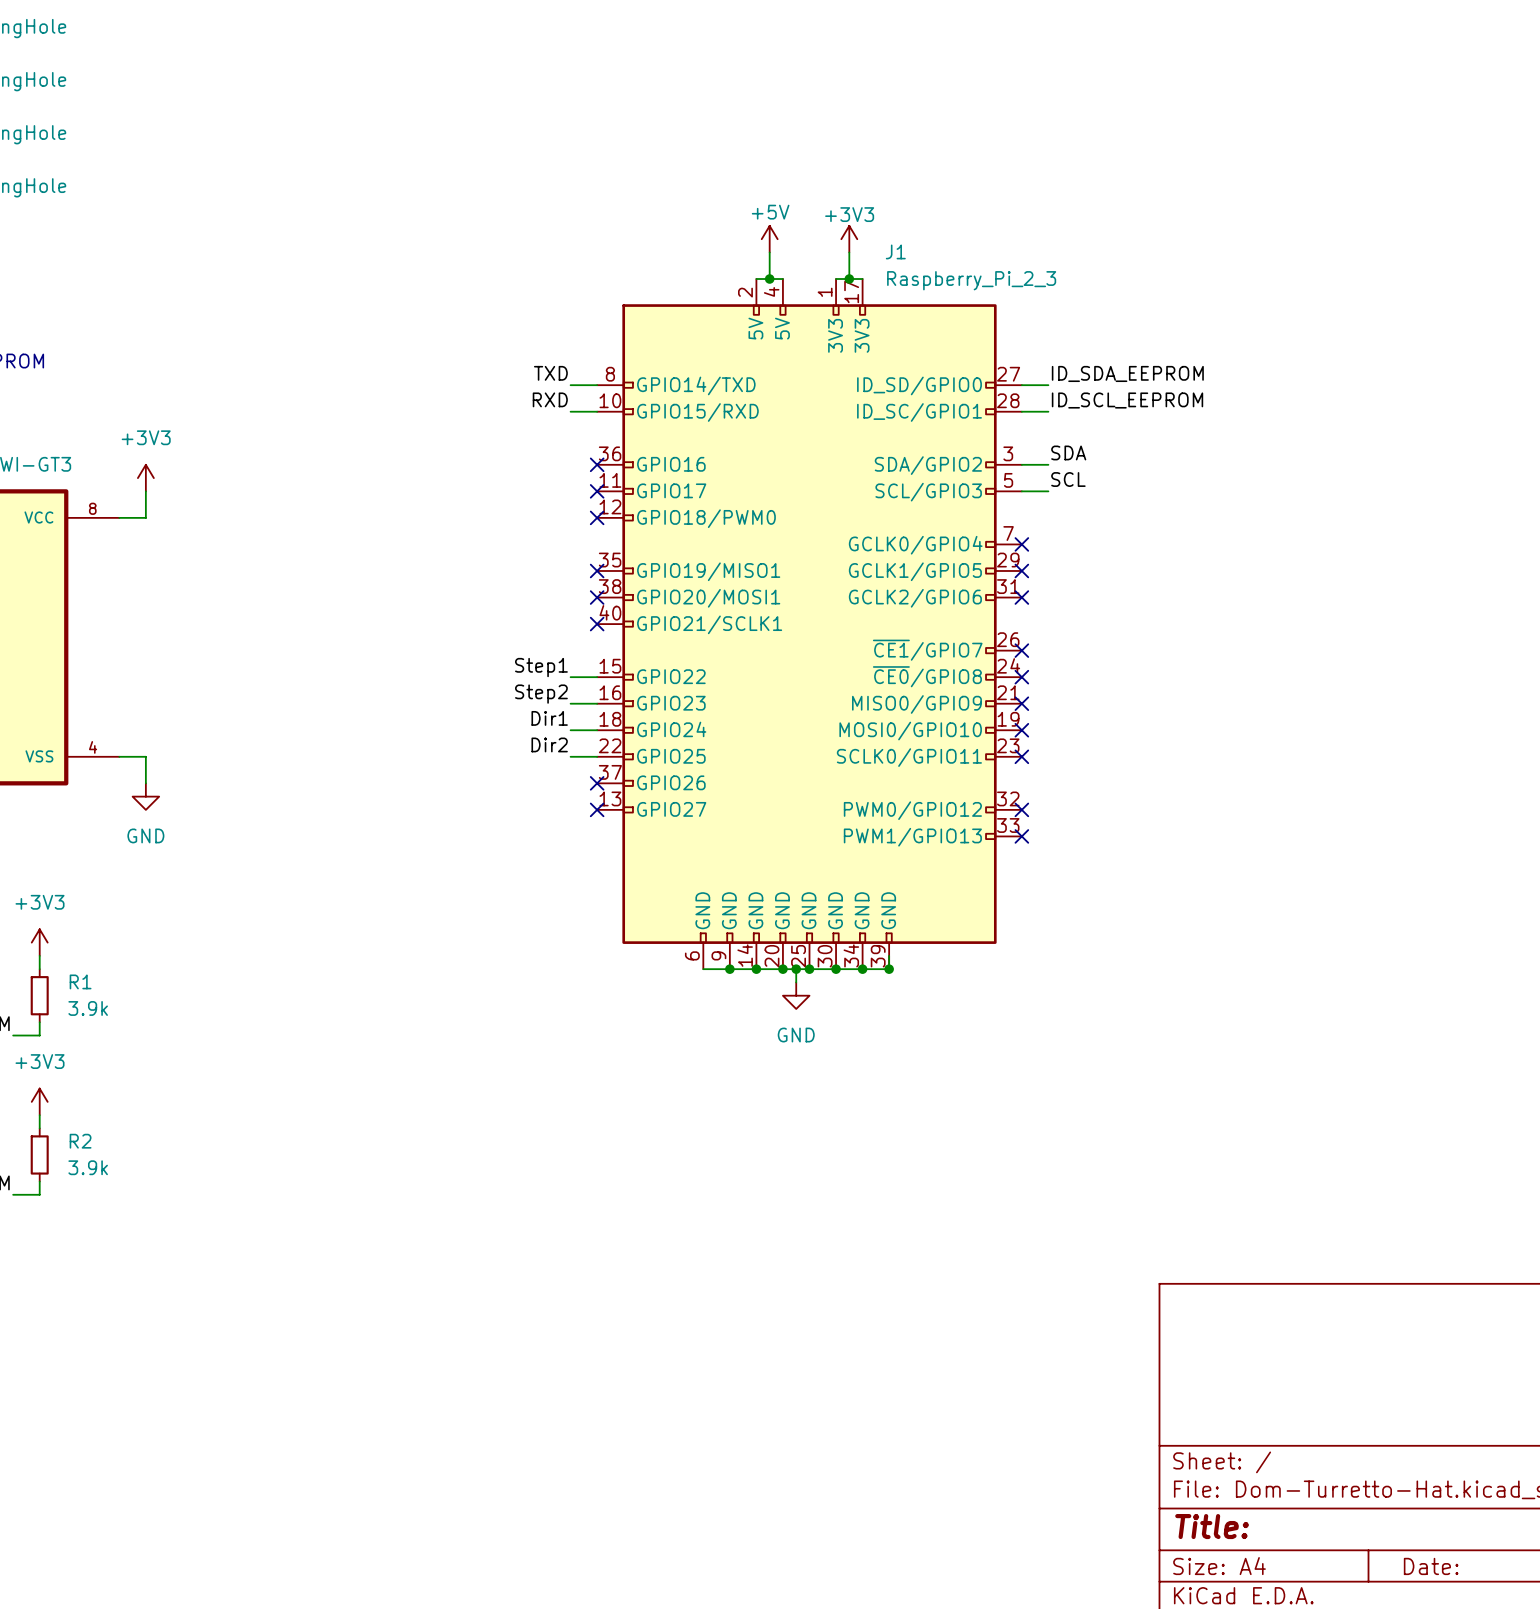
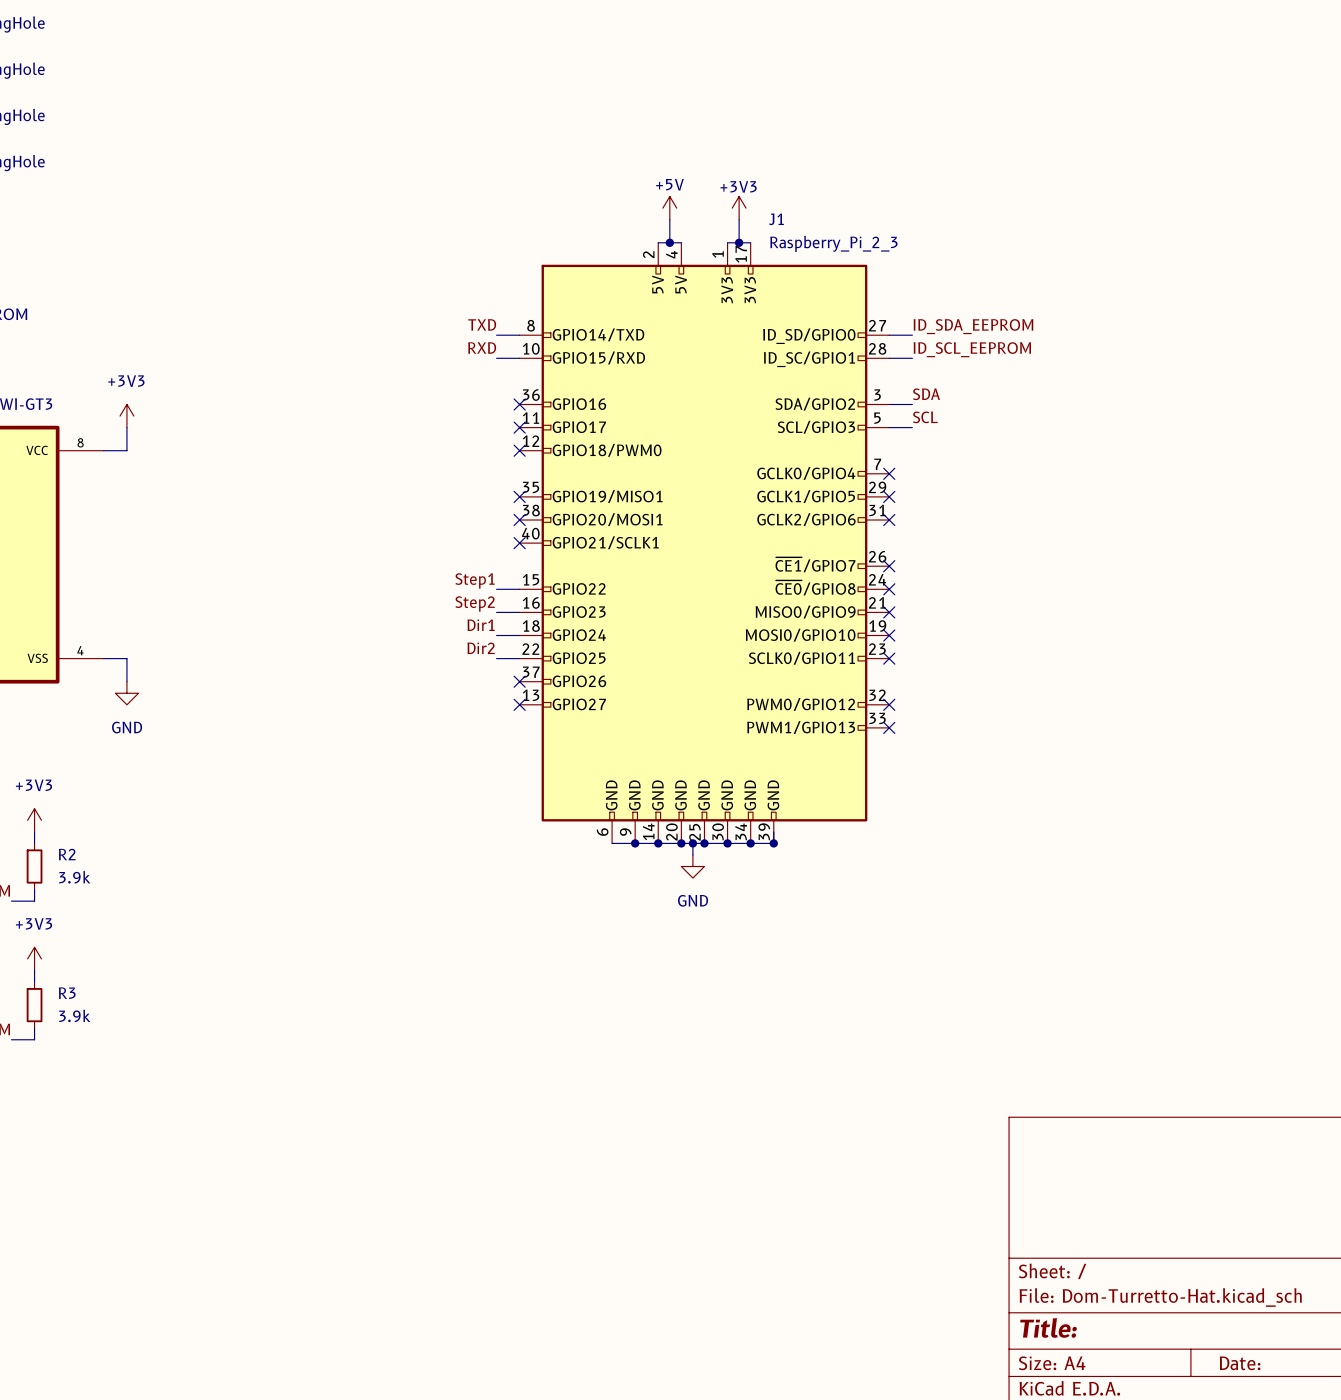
R1 name: R1 (80, 981) -> R2 (67, 854)
R2 name: R2 (80, 1141) -> R3 (67, 993)

